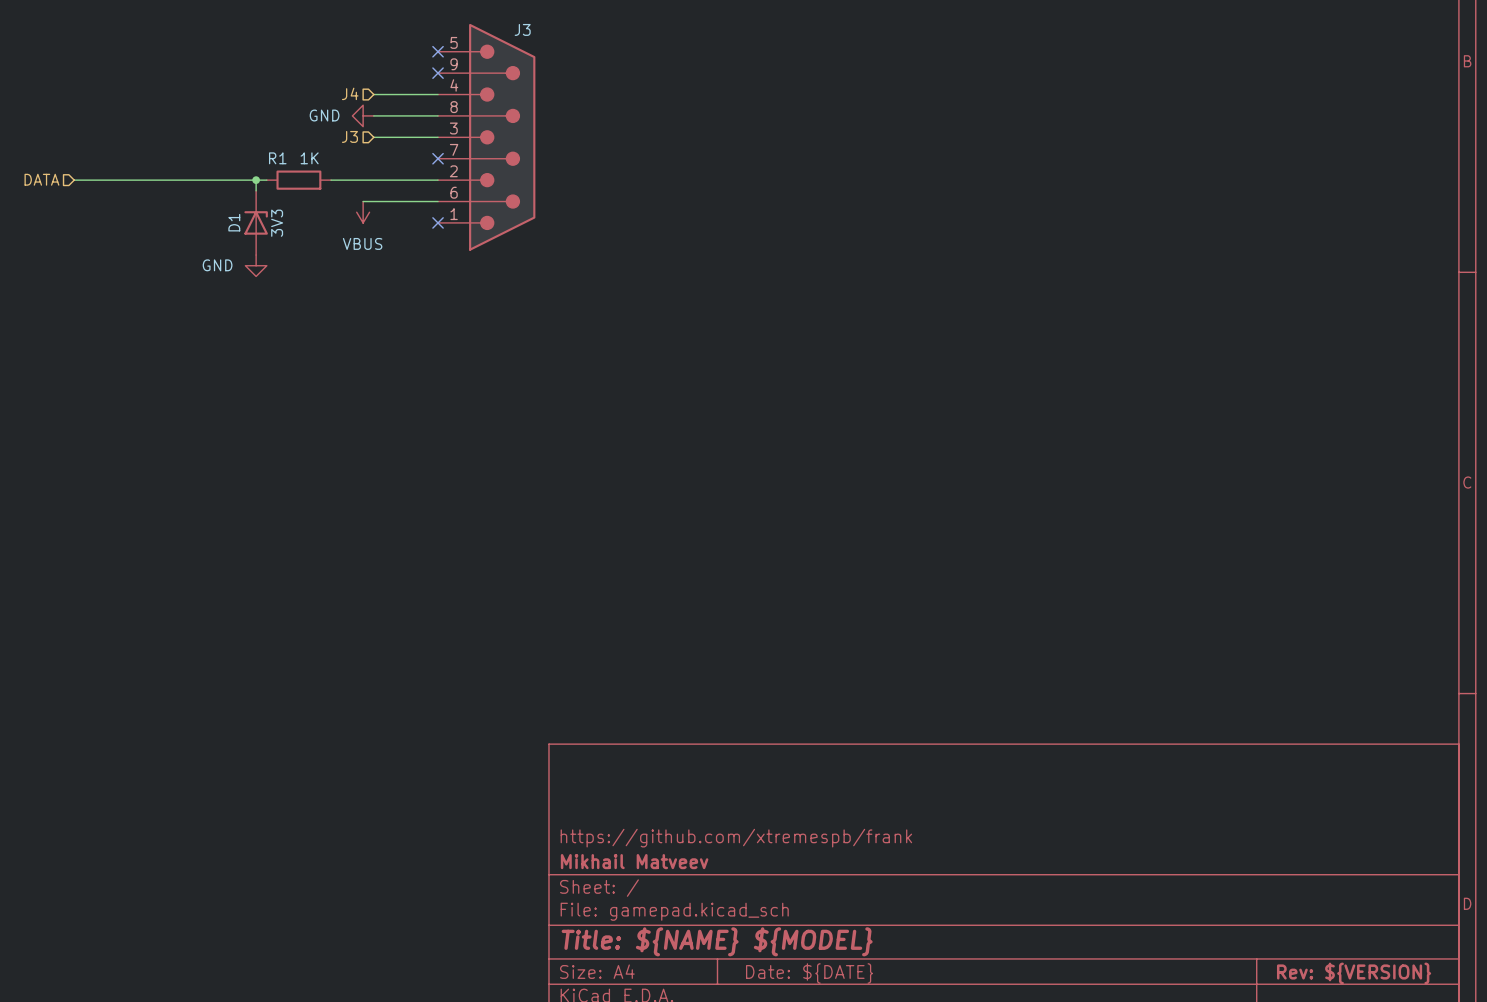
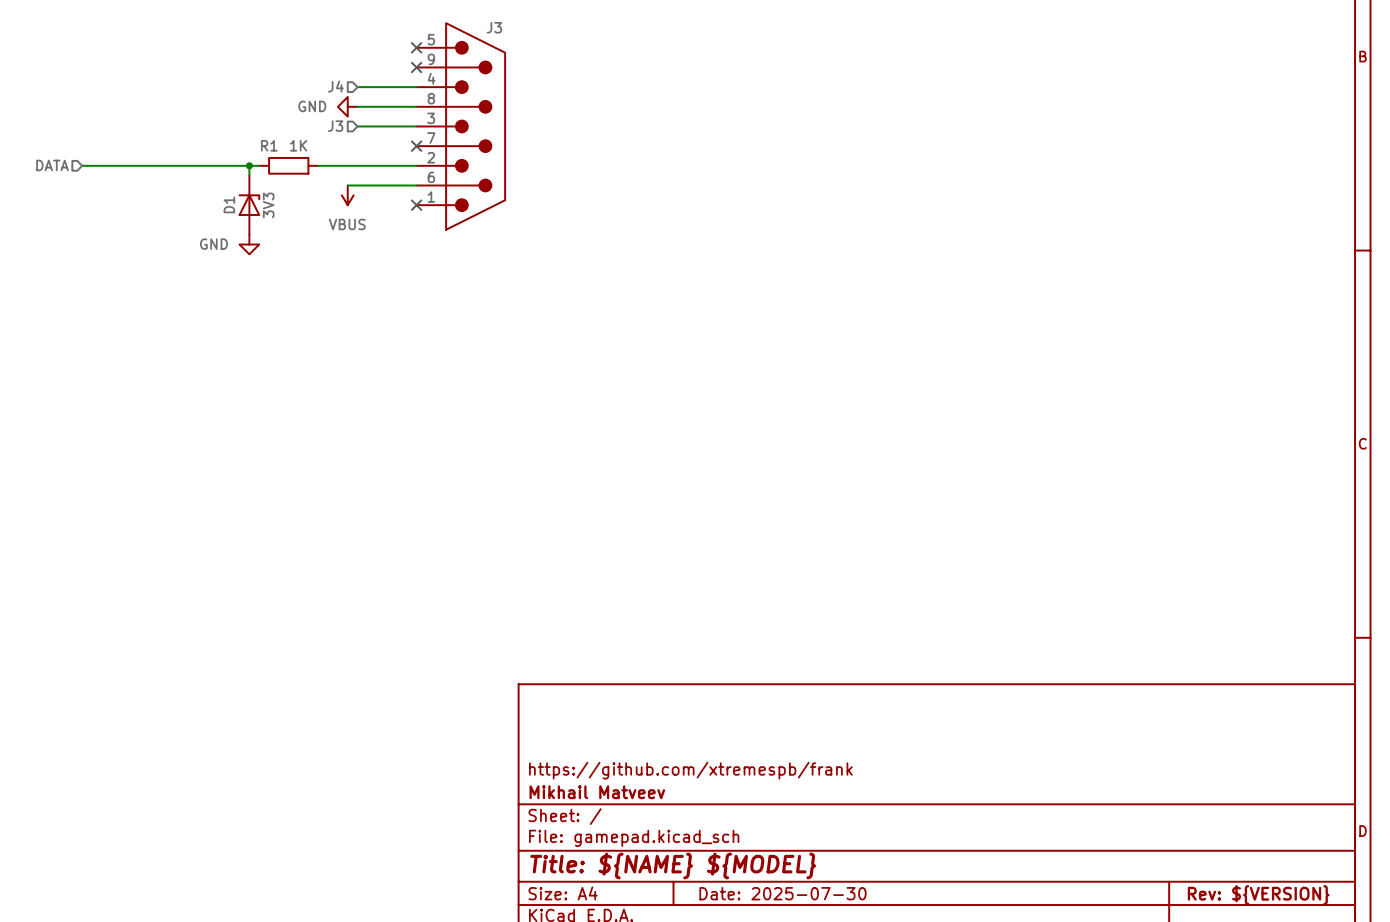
title block: Date: ${DATE} (809, 973) -> Date: 2025-07-30 (782, 893)

